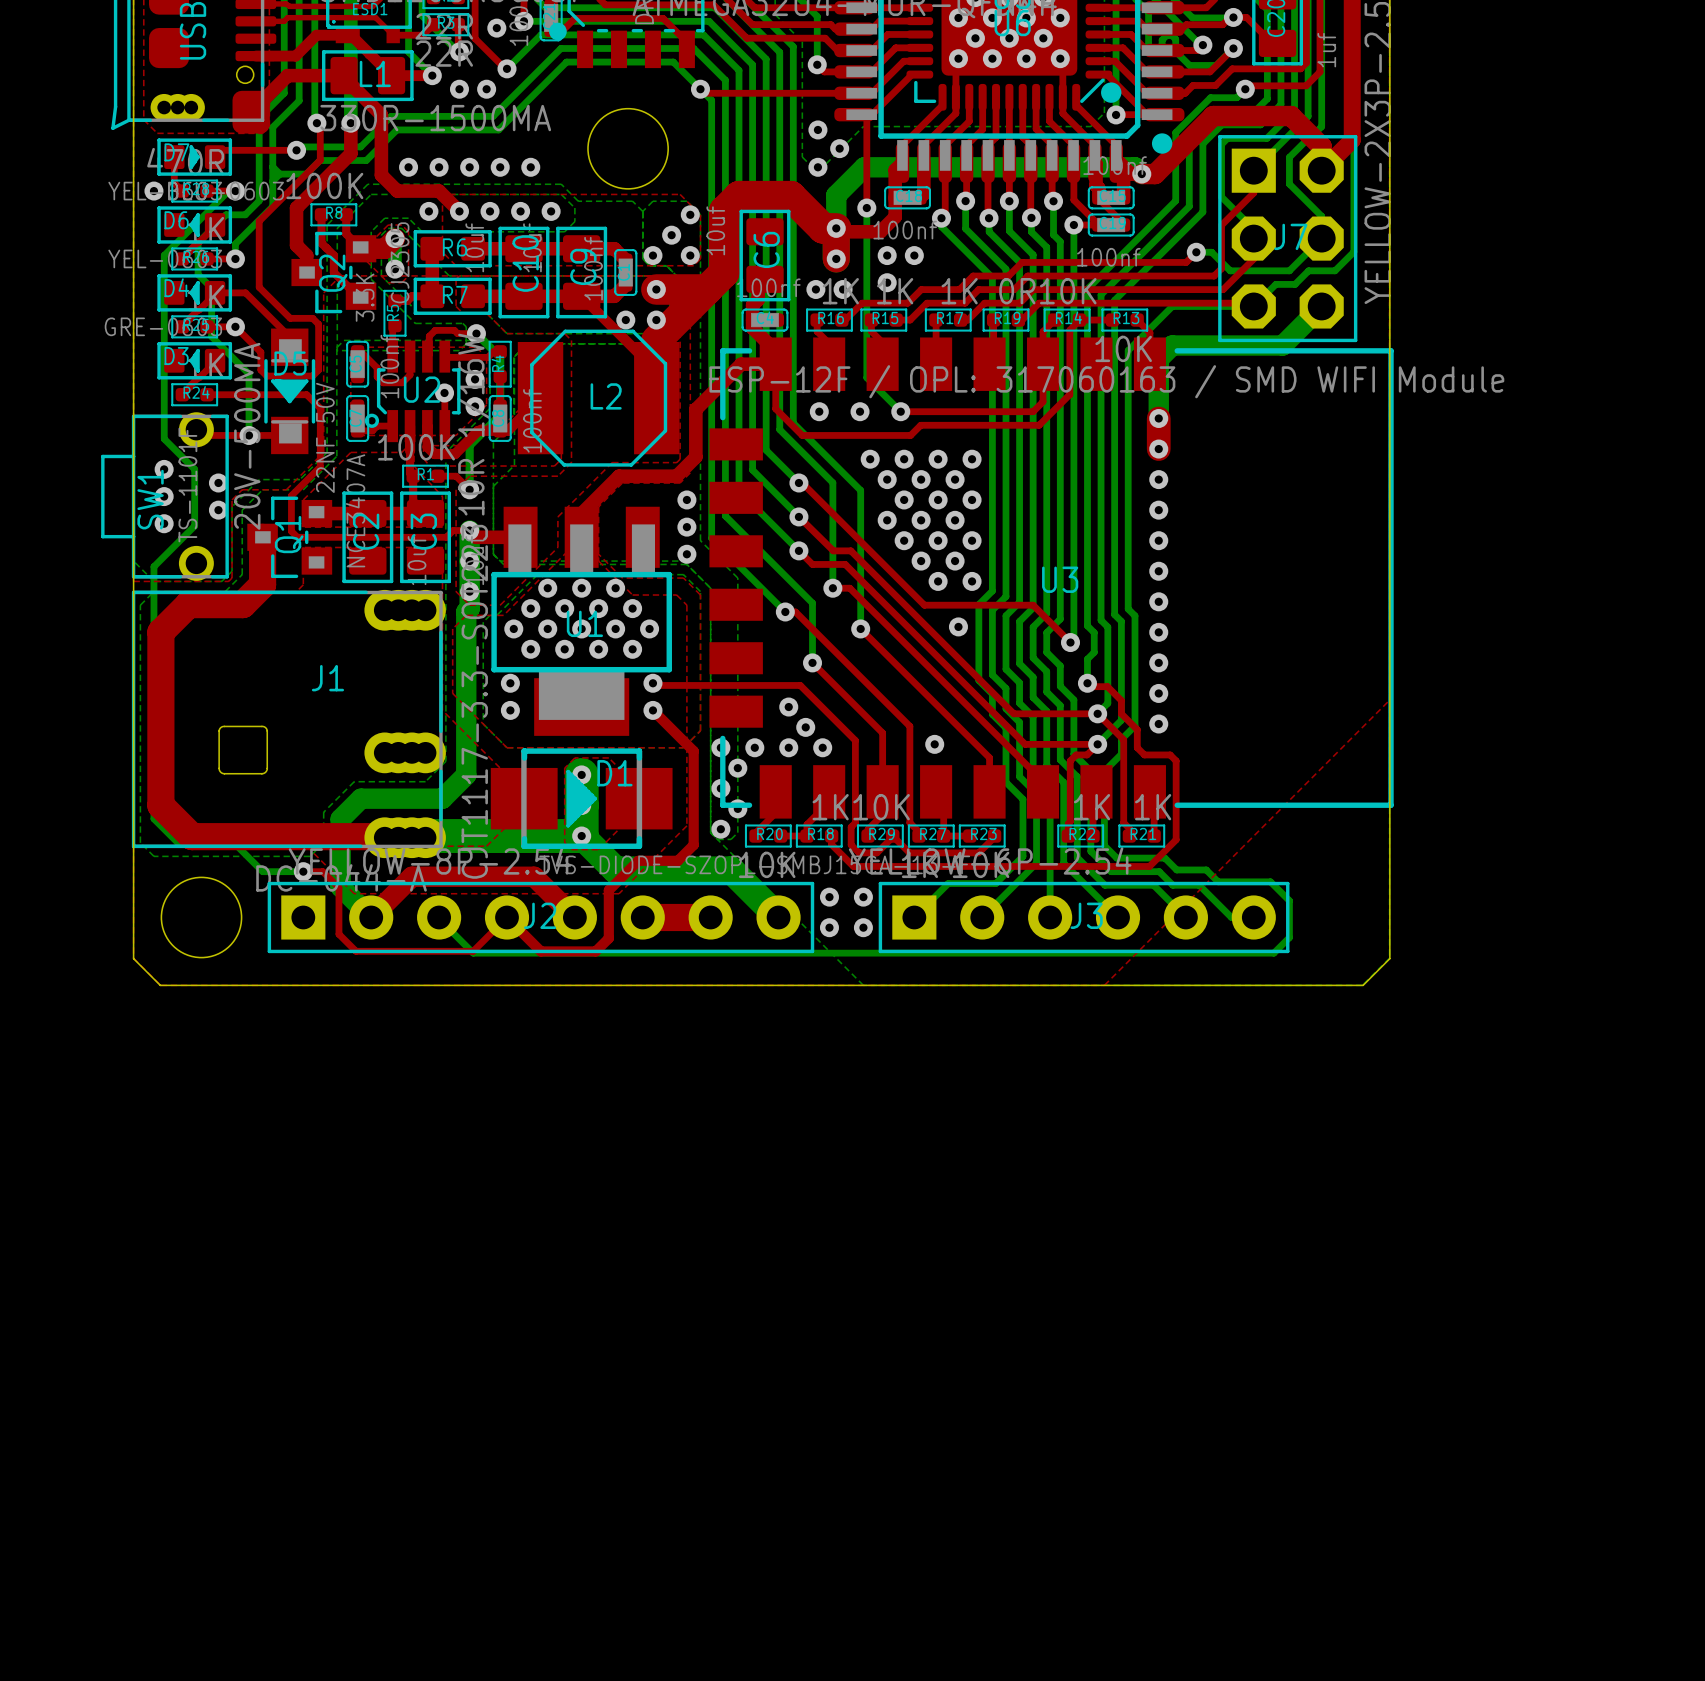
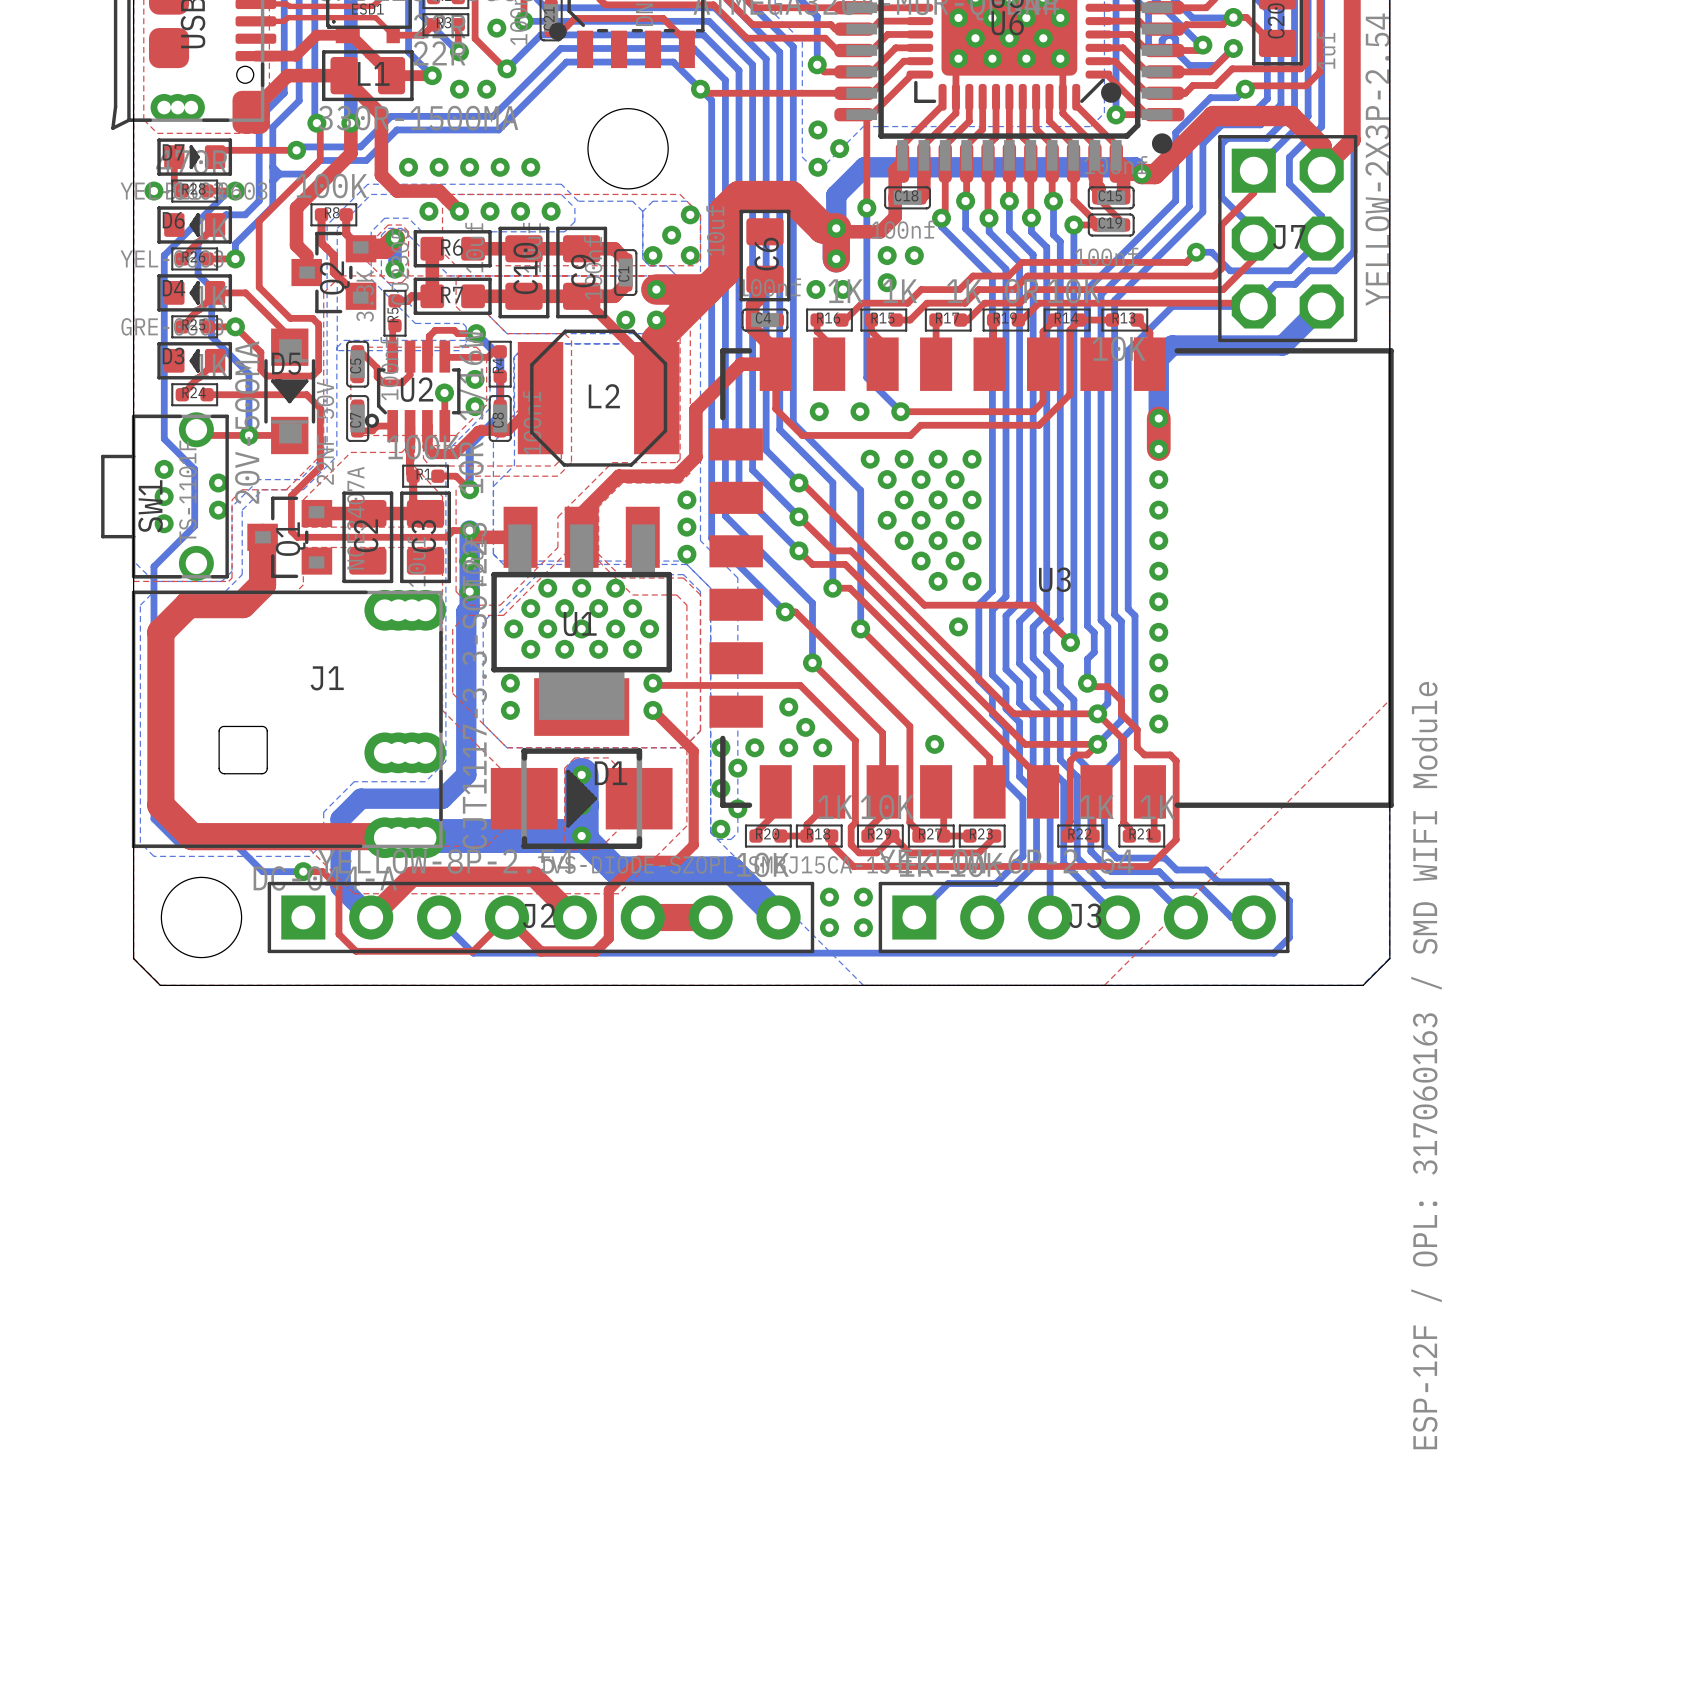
U3 value rotation: 0° (1106, 381) -> 90° counterclockwise (1426, 1065)

